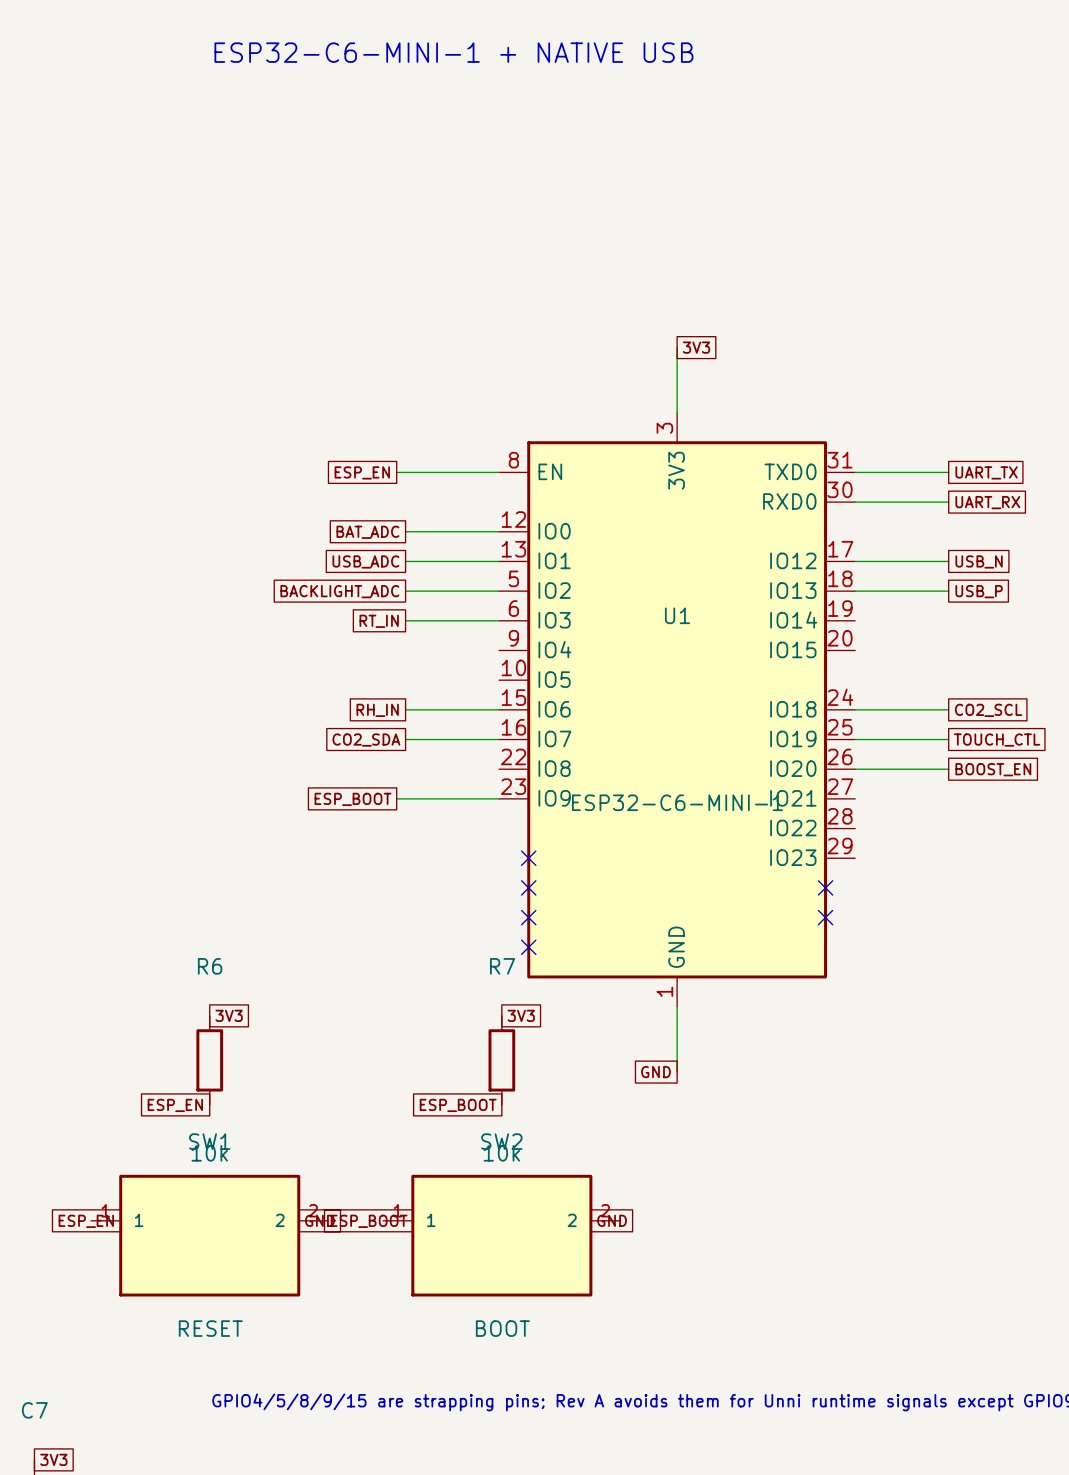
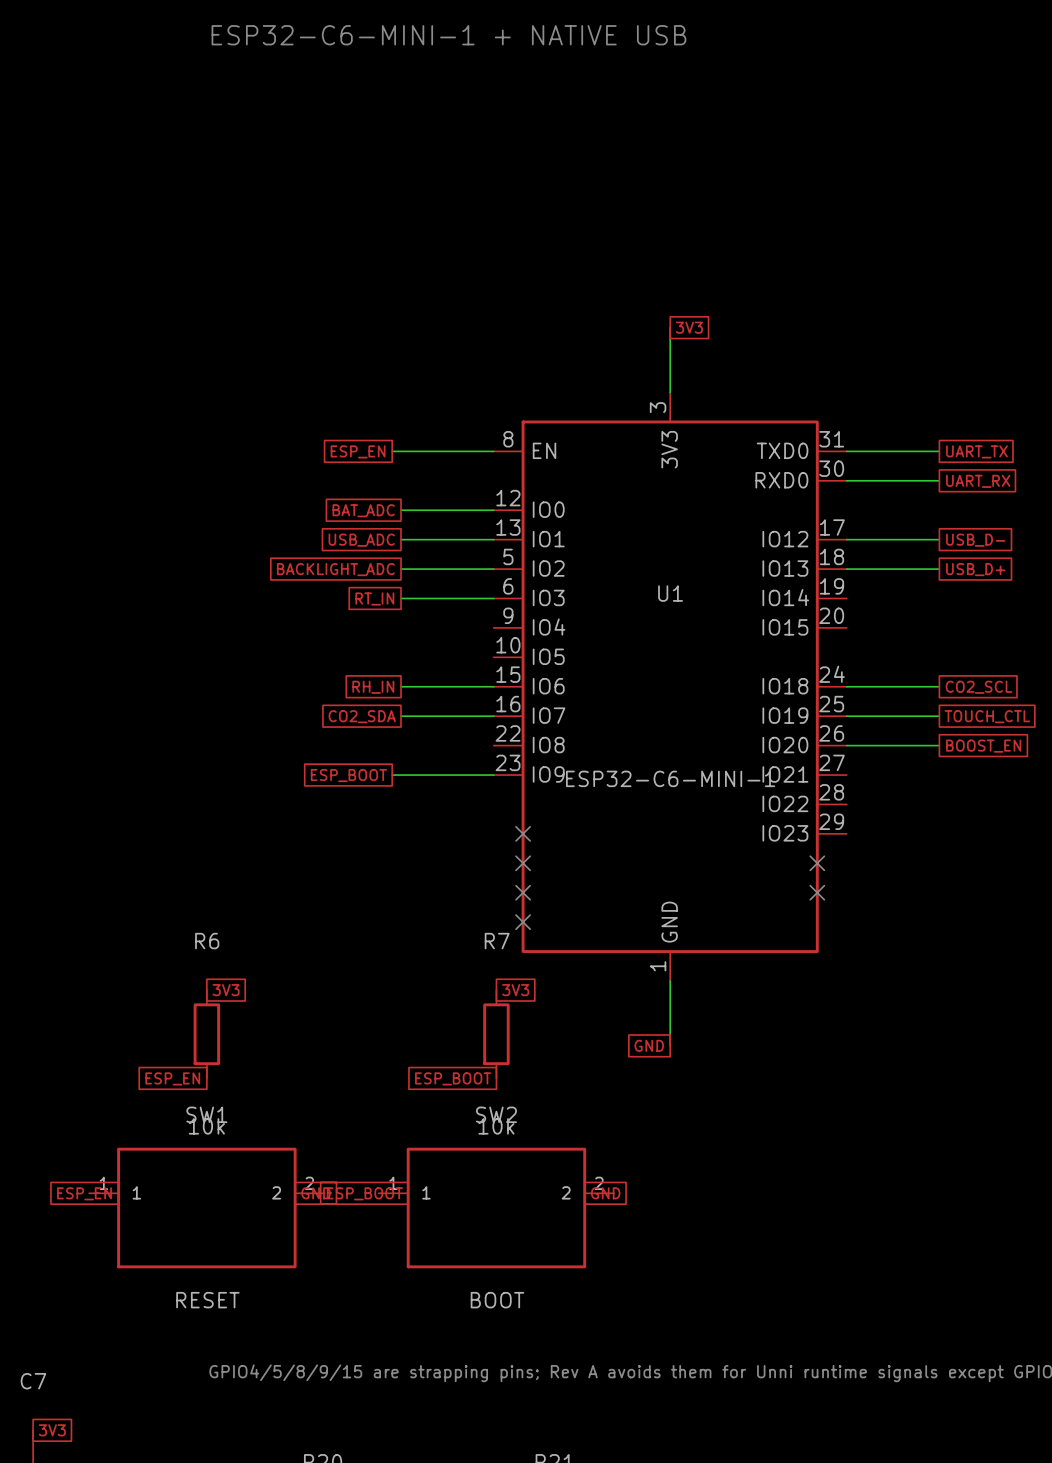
global label: USB_N (979, 561) -> USB_D- (975, 540)
global label: USB_P (979, 591) -> USB_D+ (975, 569)

